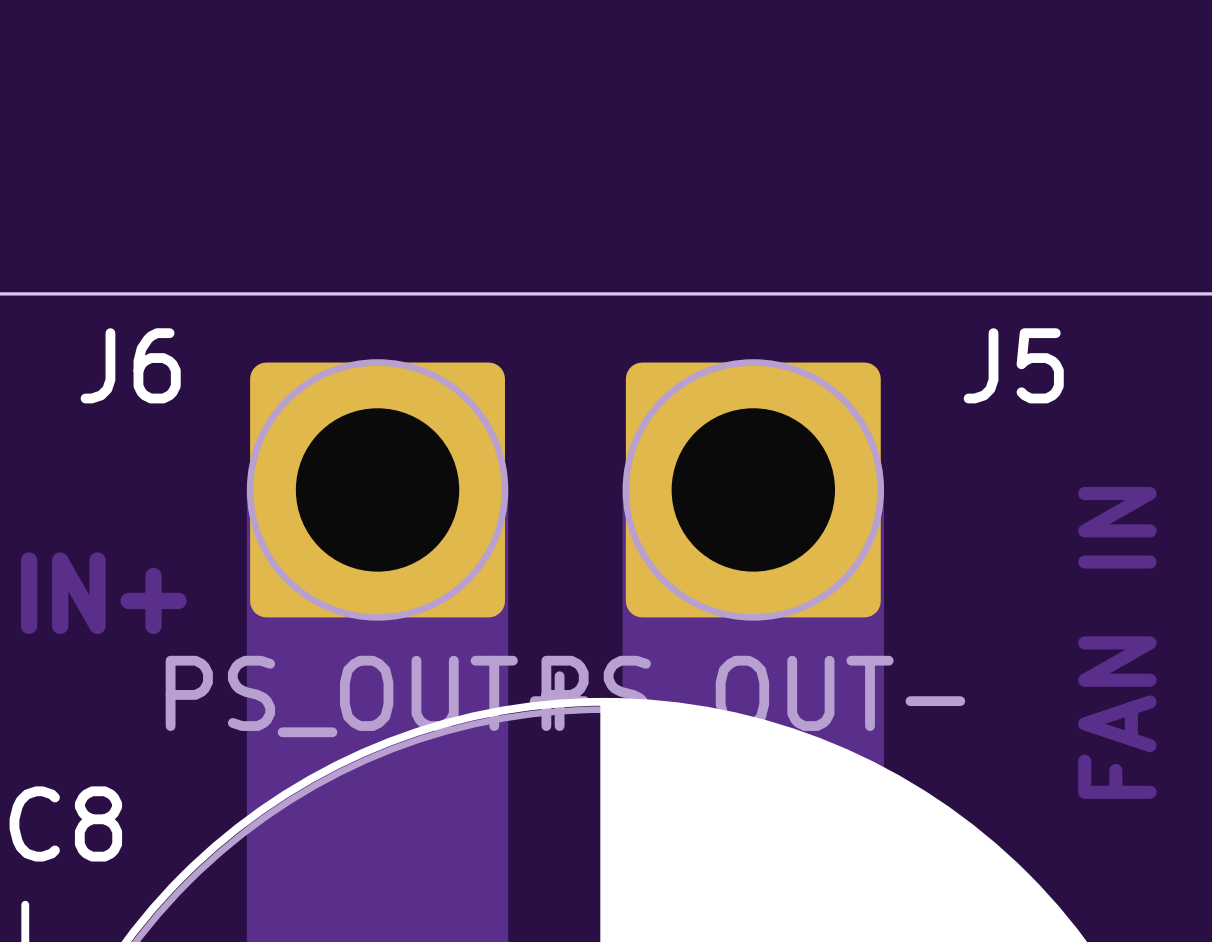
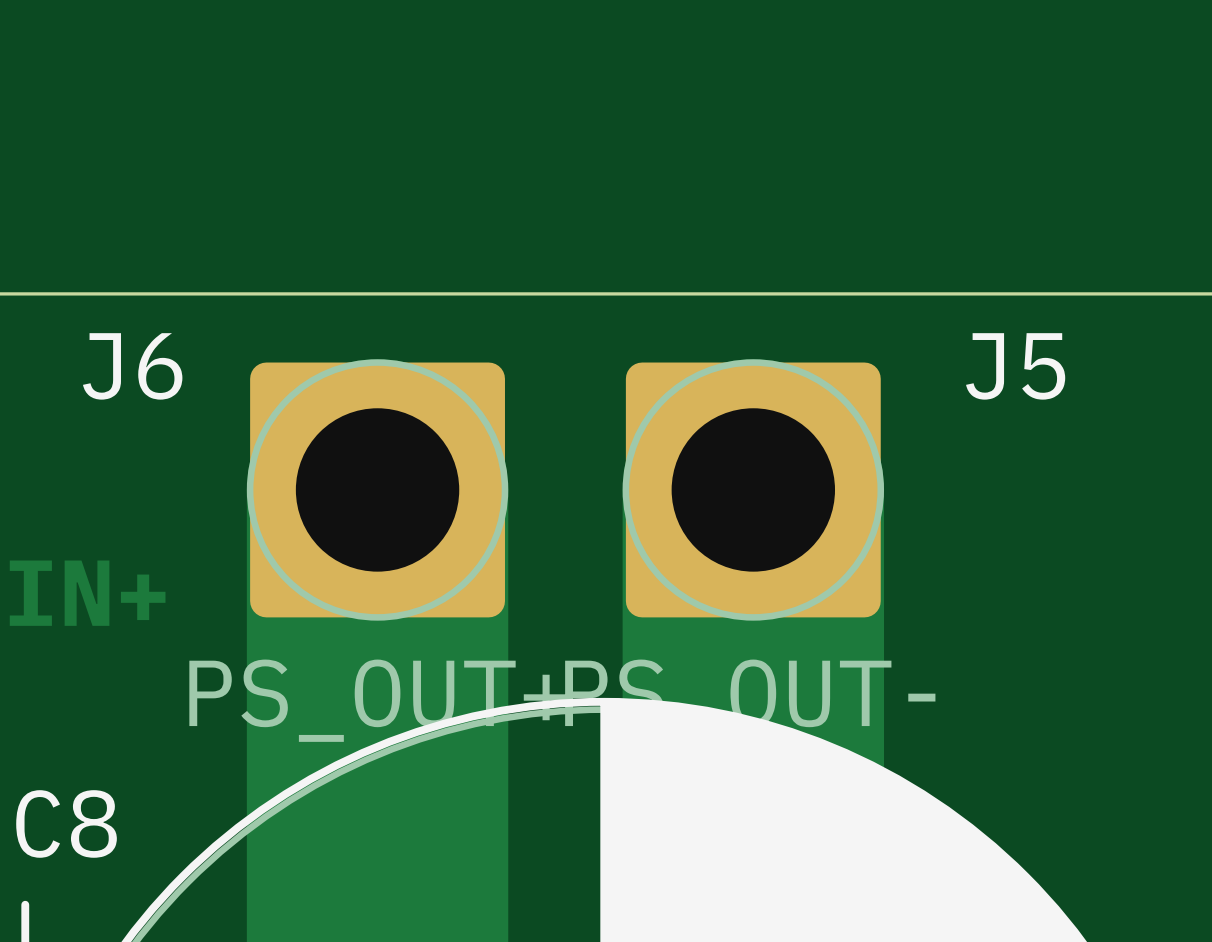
text: FAN IN (1117, 642) -> none

